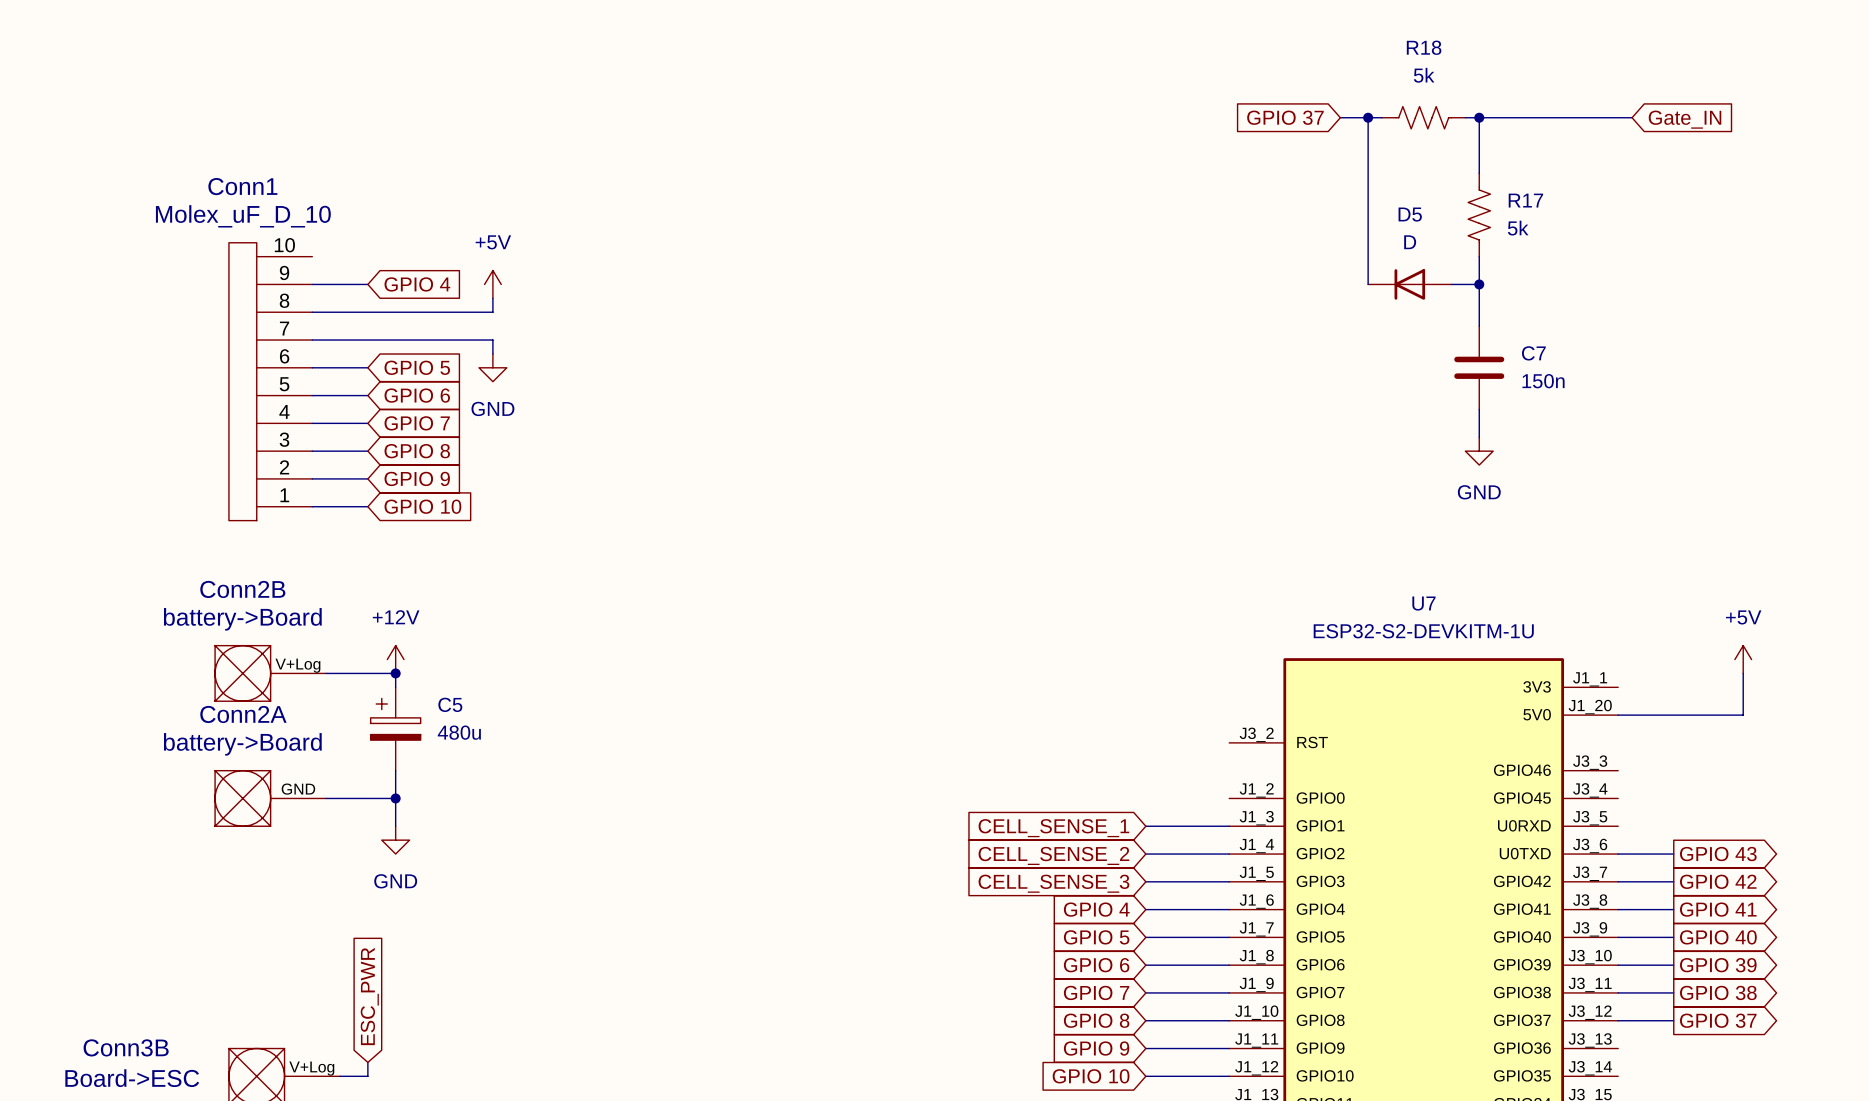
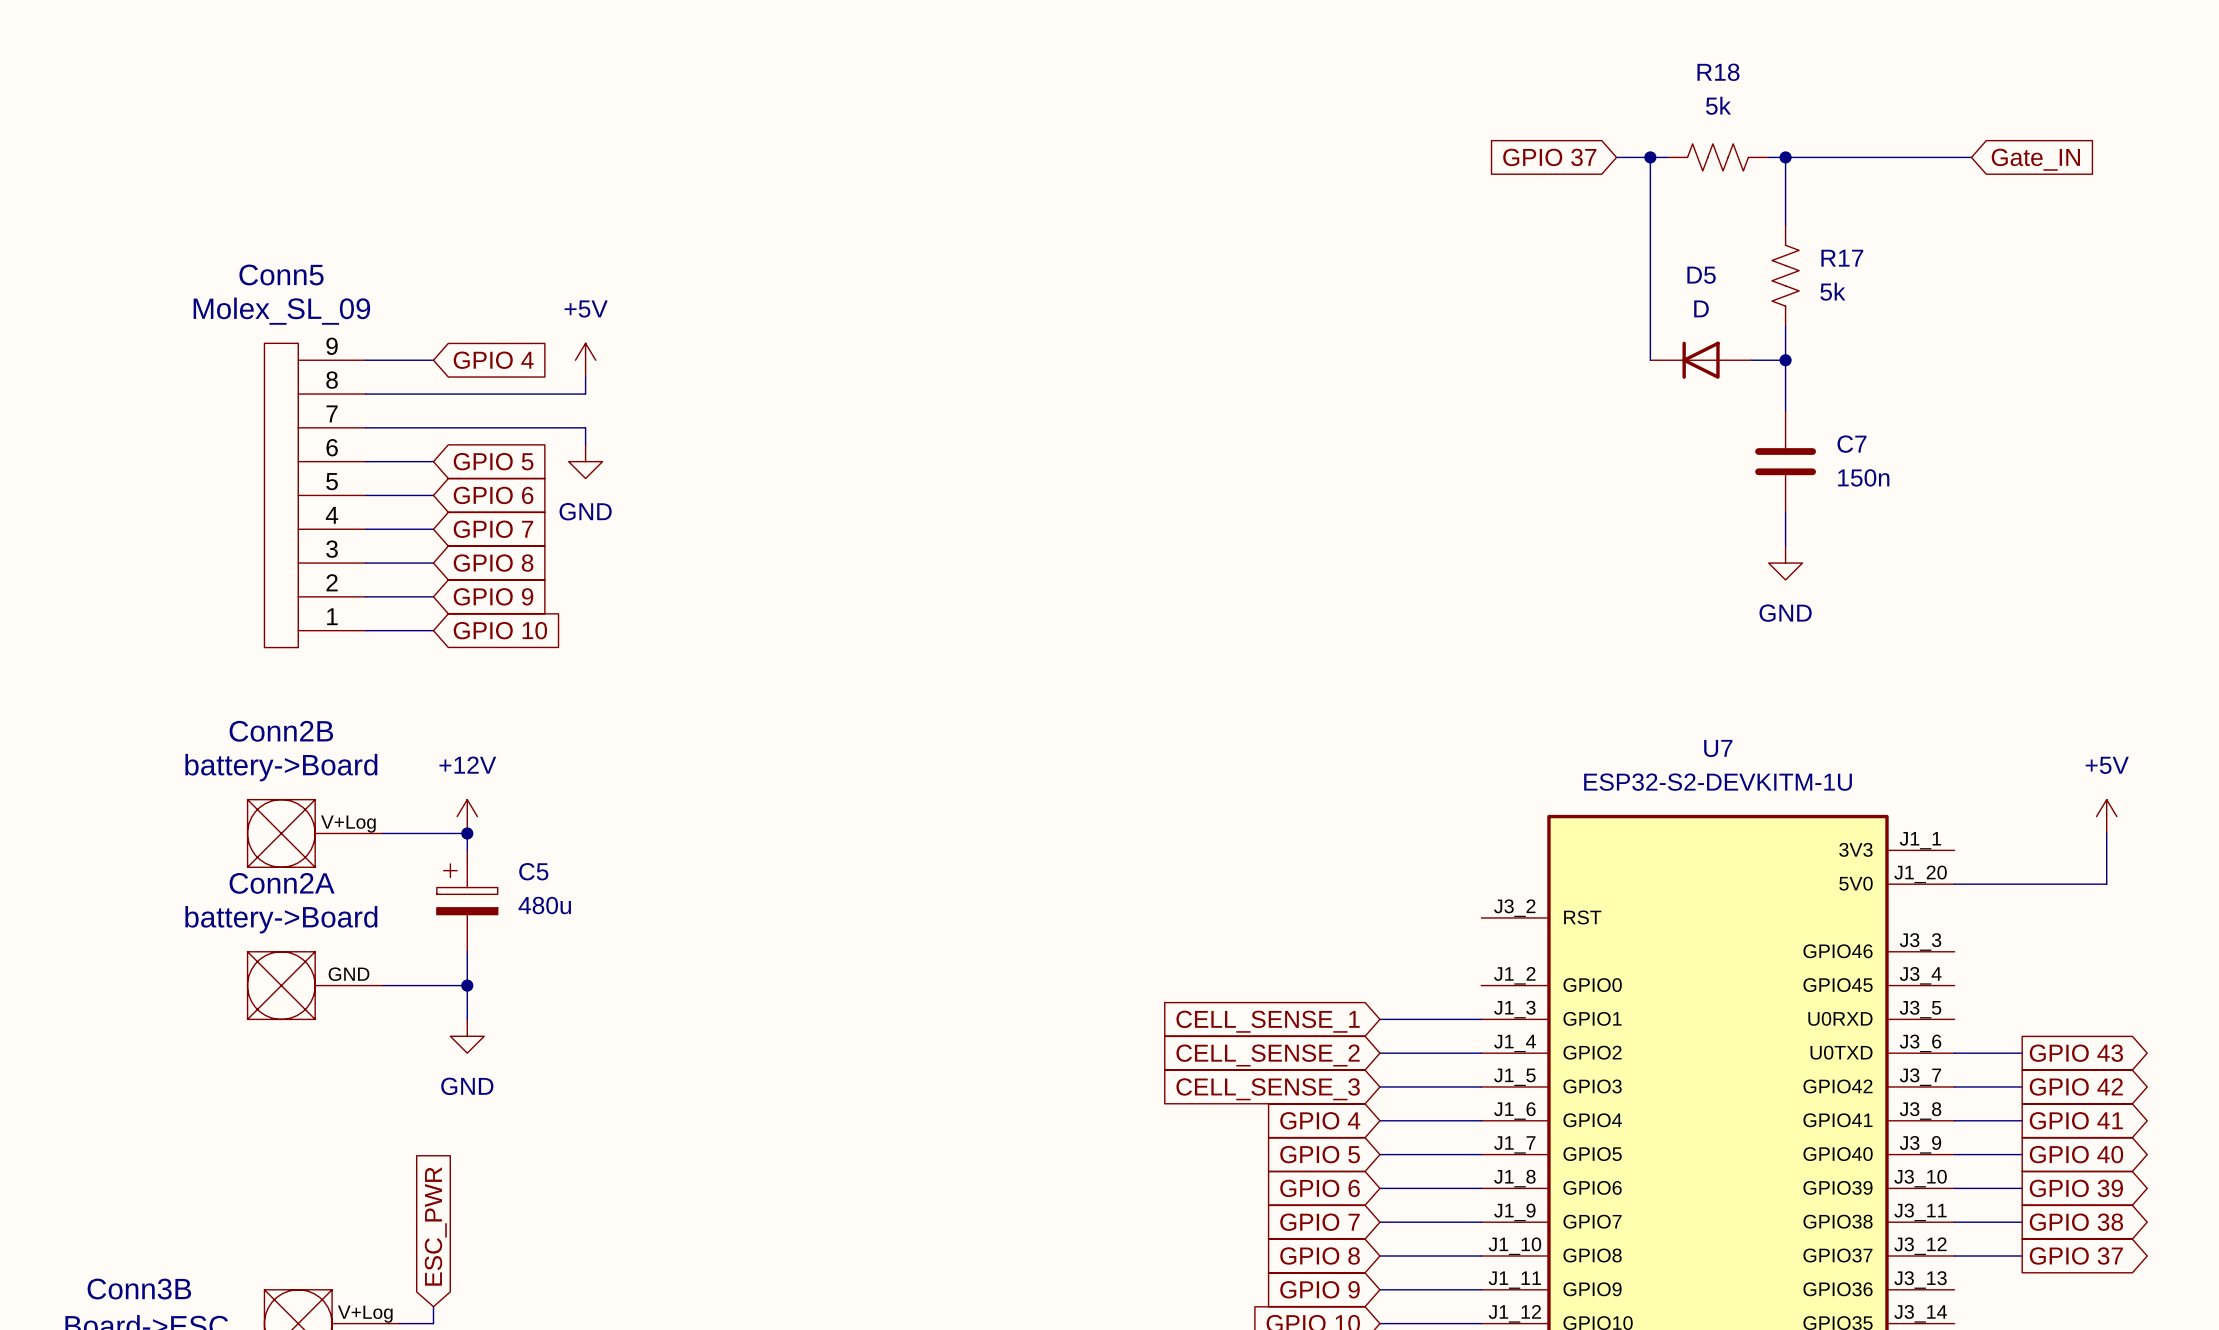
Conn1: Molex_uF_D_10 (270, 381) -> none
Conn5: none -> Molex_SL_09 (315, 495)

